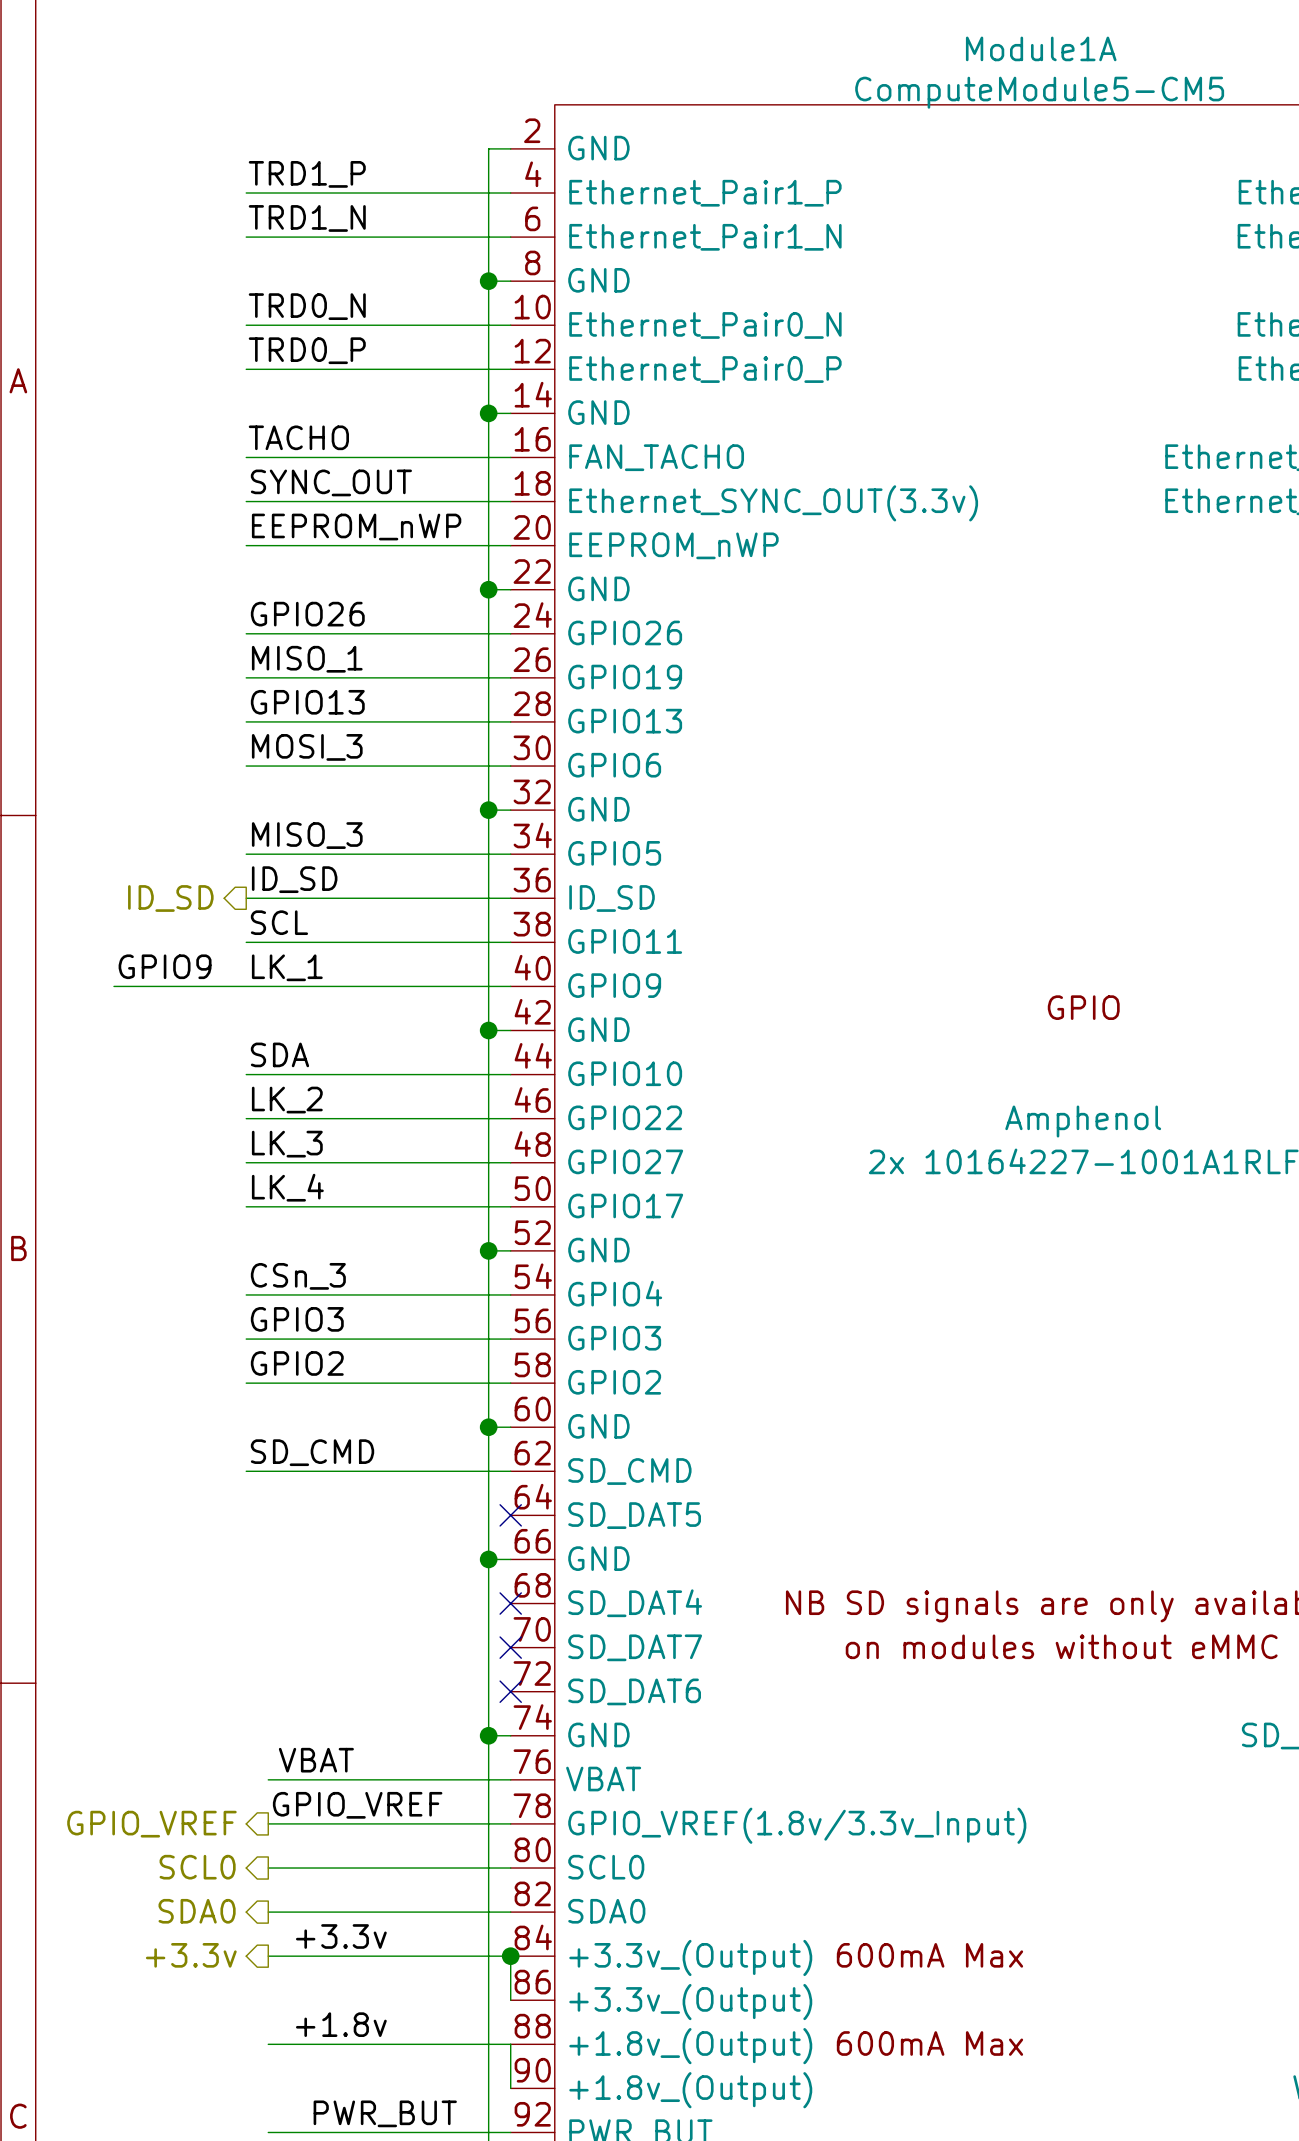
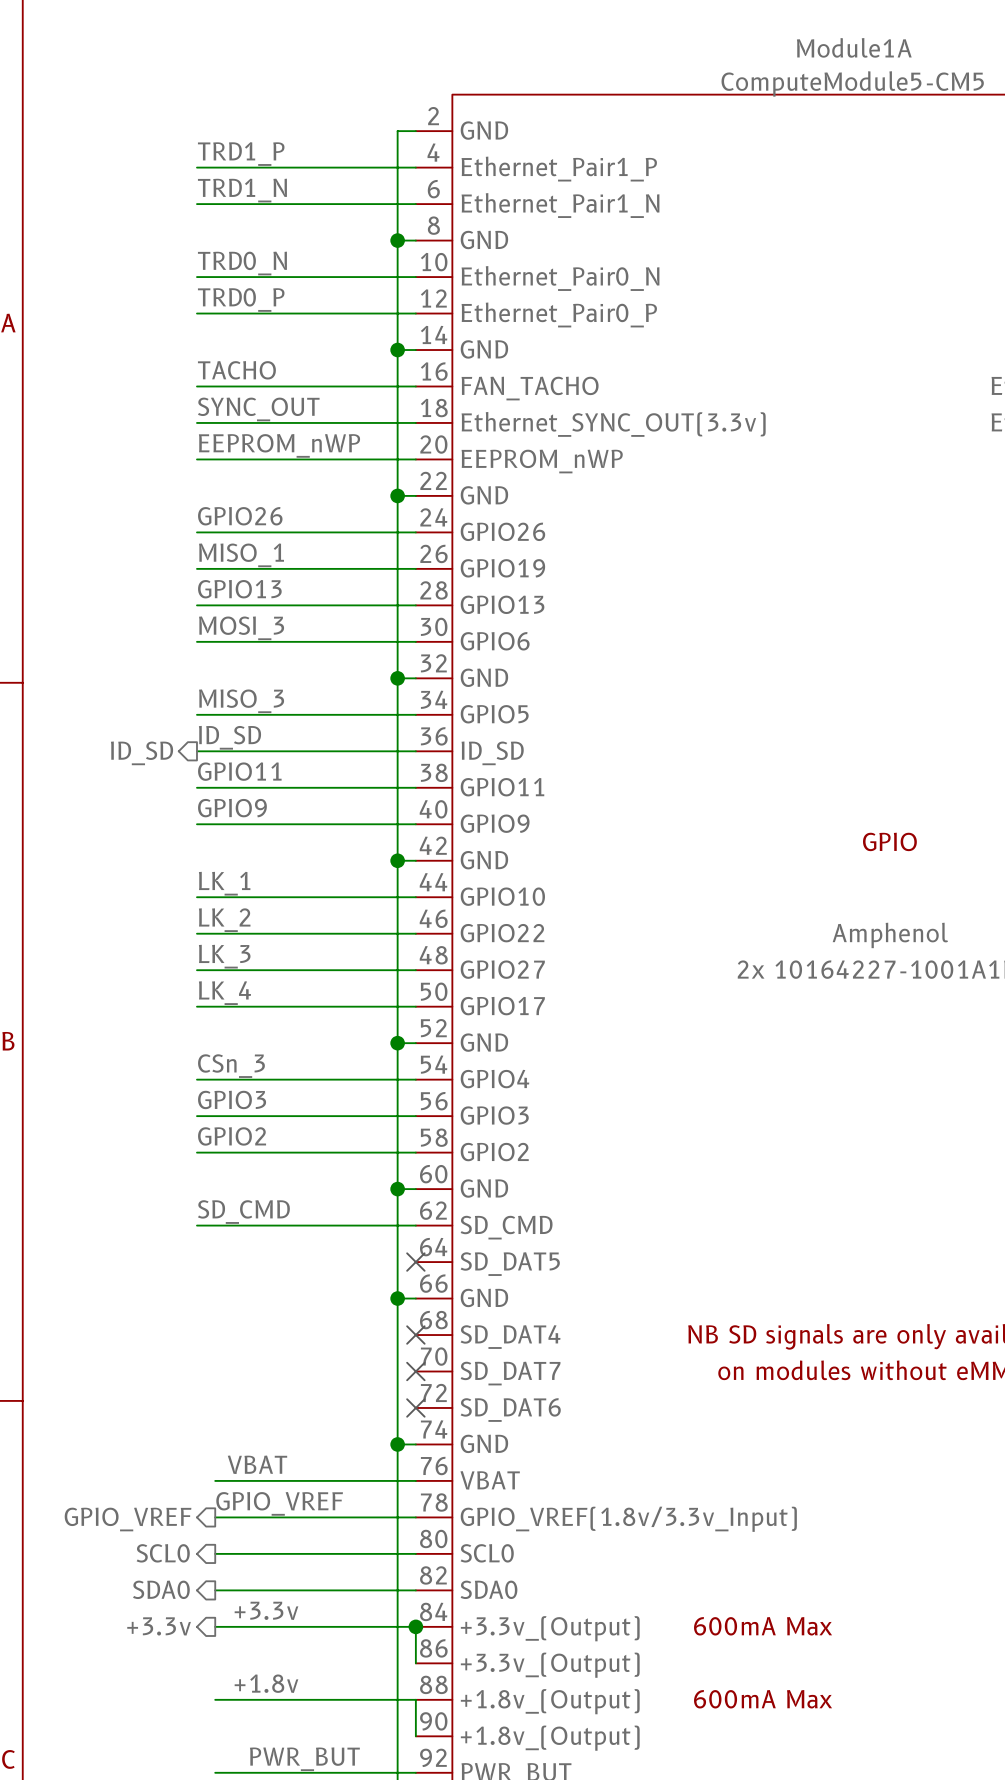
label: SCL (279, 922) -> GPIO11 (239, 771)
label: GPIO9 (165, 966) -> none
label: LK_1 (287, 967) -> GPIO9 (232, 808)
wire: (113, 986) (246, 986) -> none
label: SDA (279, 1054) -> LK_1 (224, 883)

